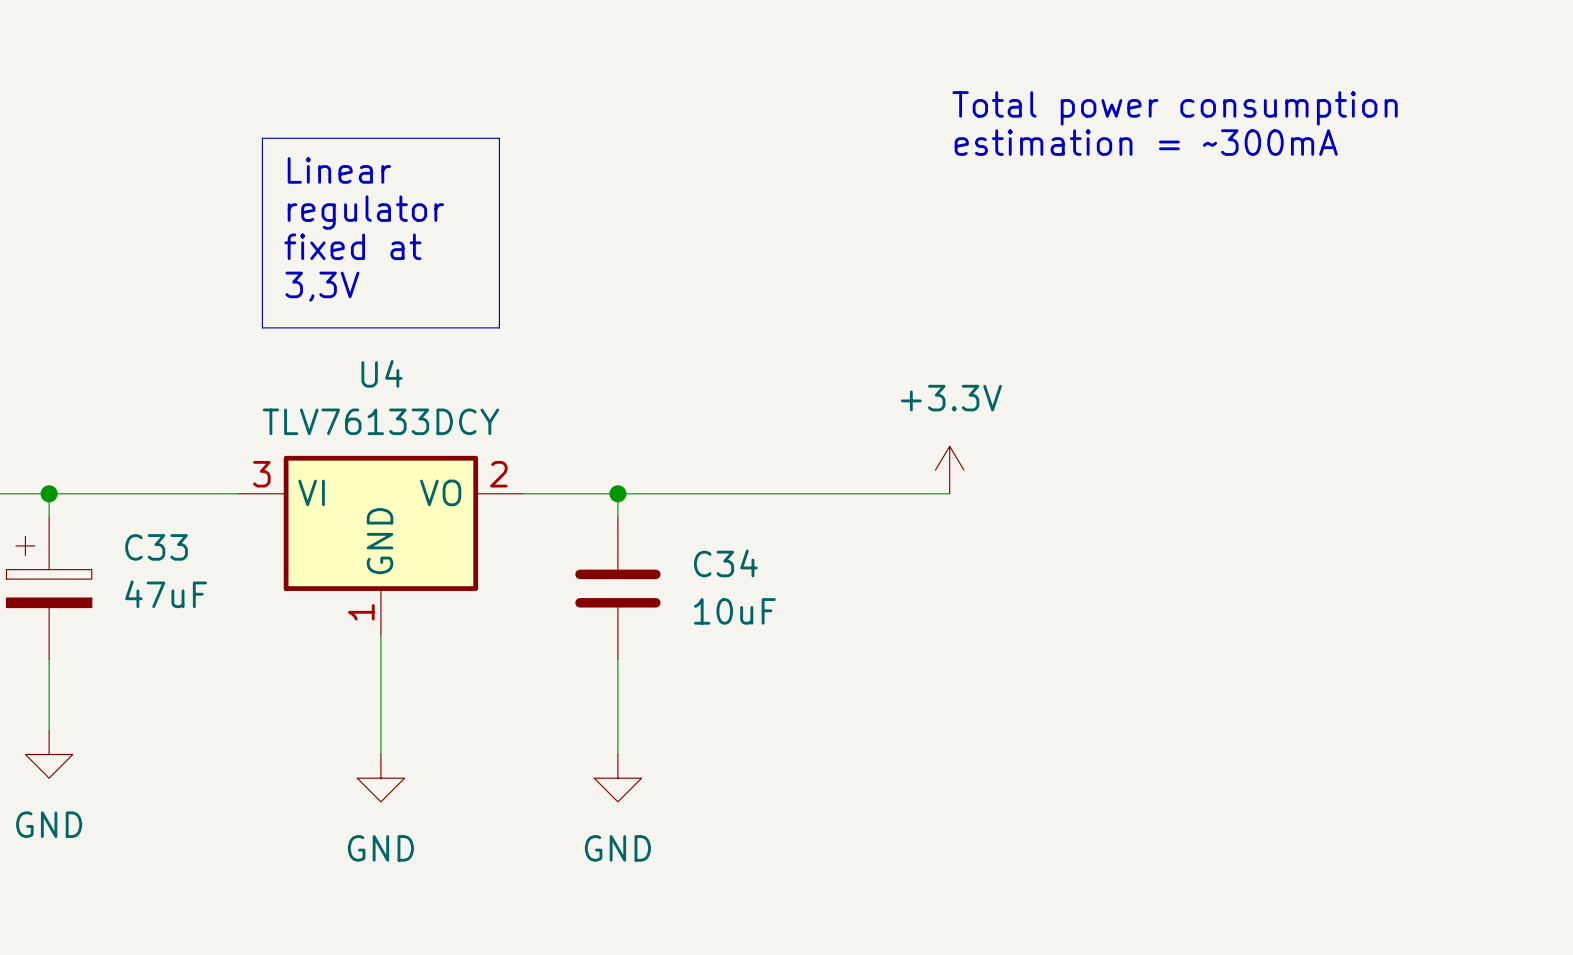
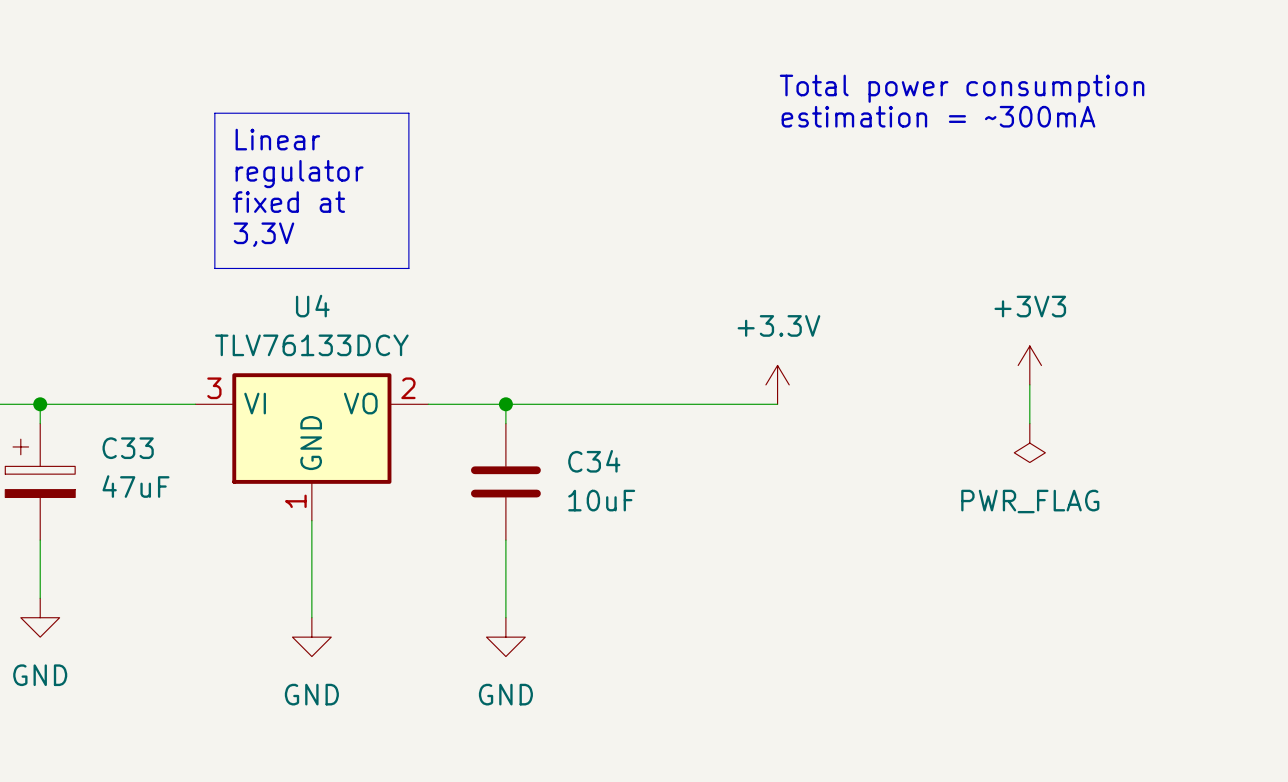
power symbol: none -> +3V3 (1029, 365)
wire: none -> (1029, 384) (1029, 423)
power symbol: none -> PWR_FLAG (1029, 443)

